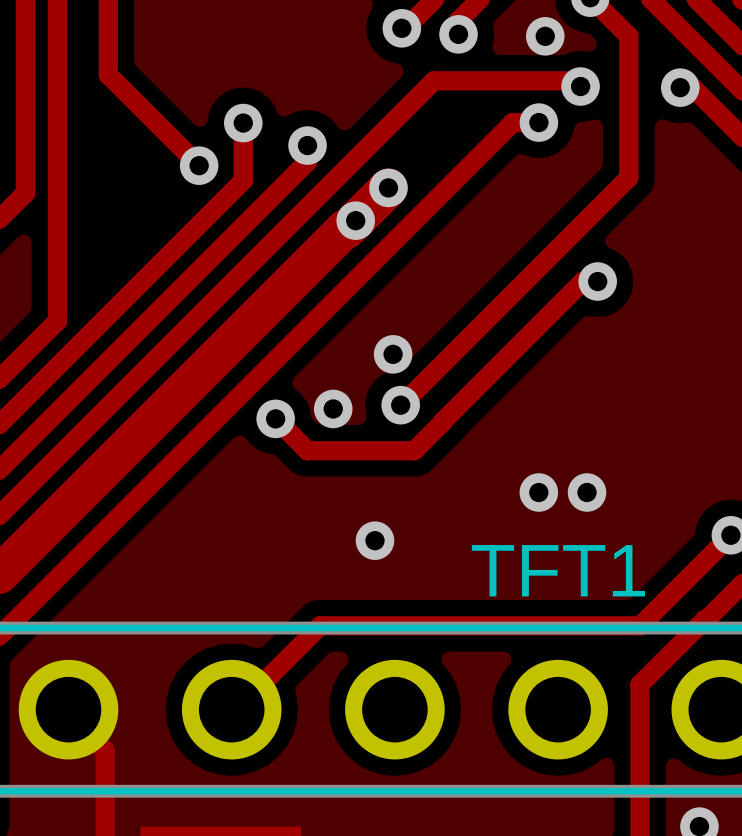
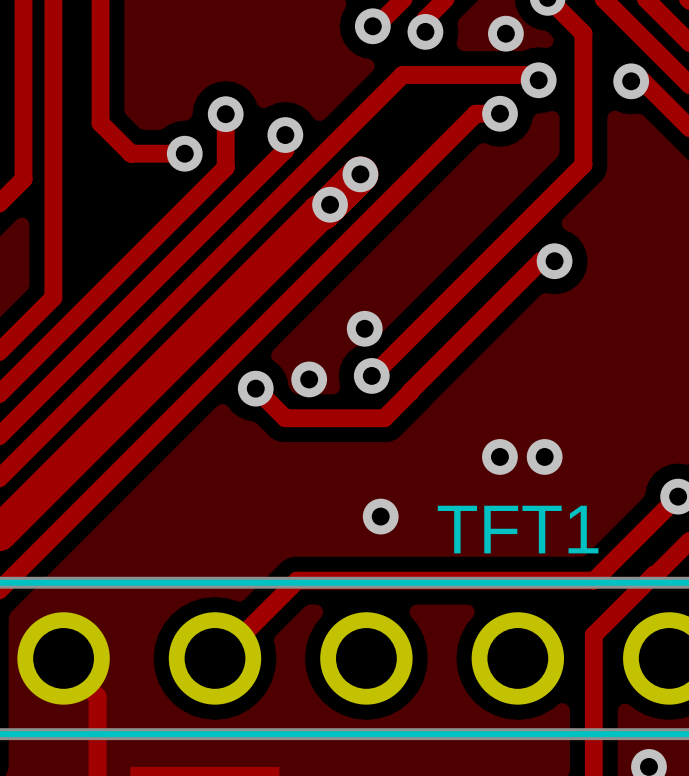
track: (108, 74) (199, 165) -> (100, 69) (100, 123) (131, 153) (184, 153)
via position: (375, 540) -> (380, 516)

